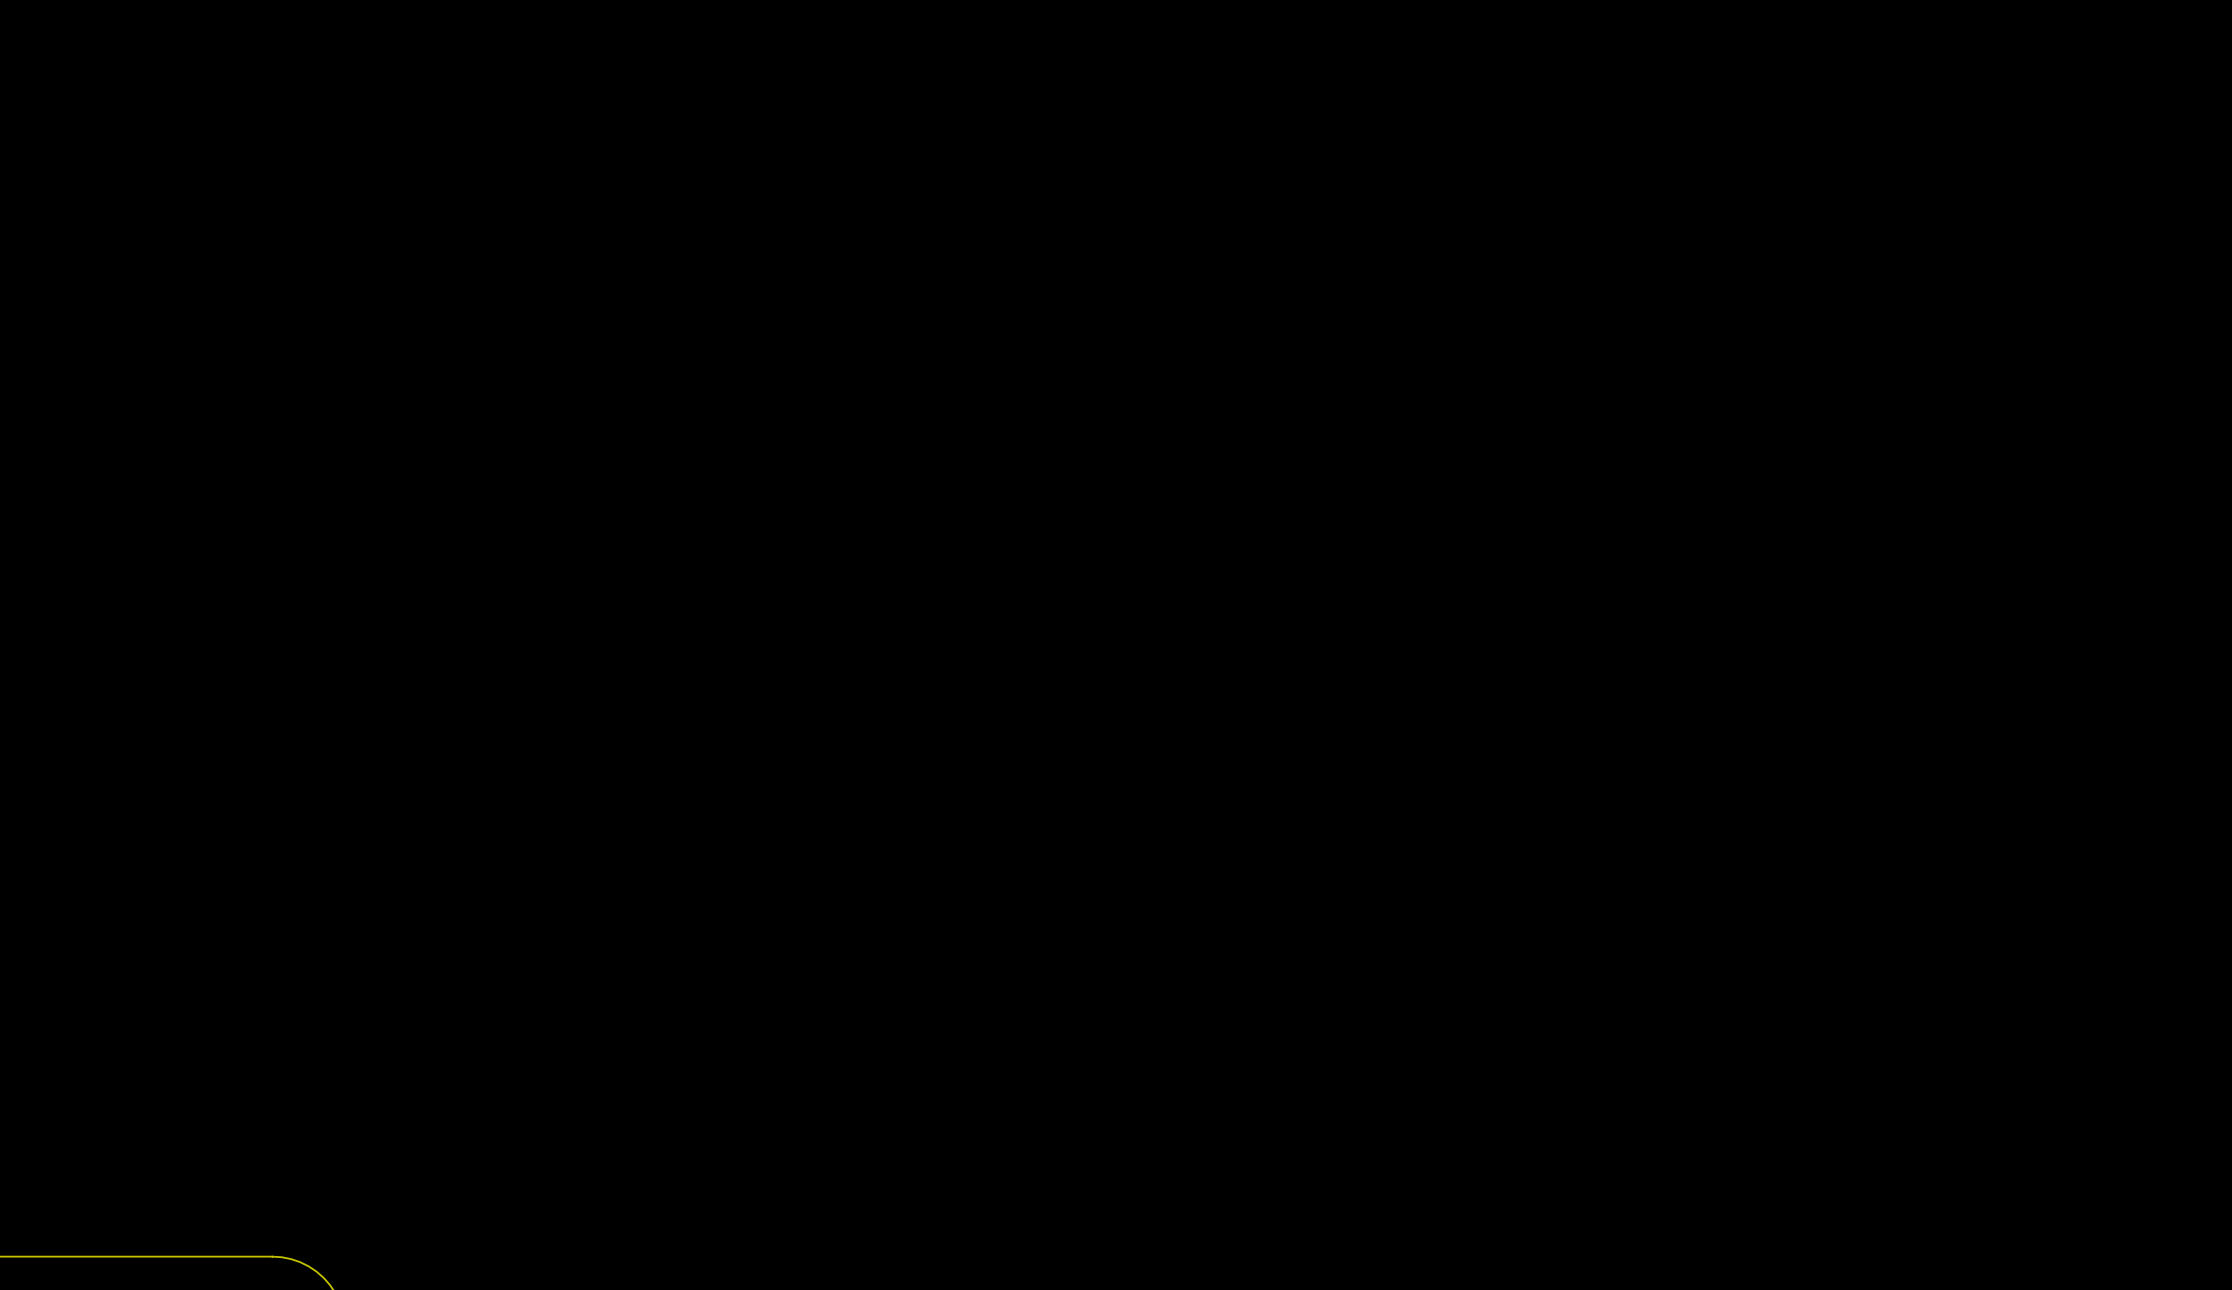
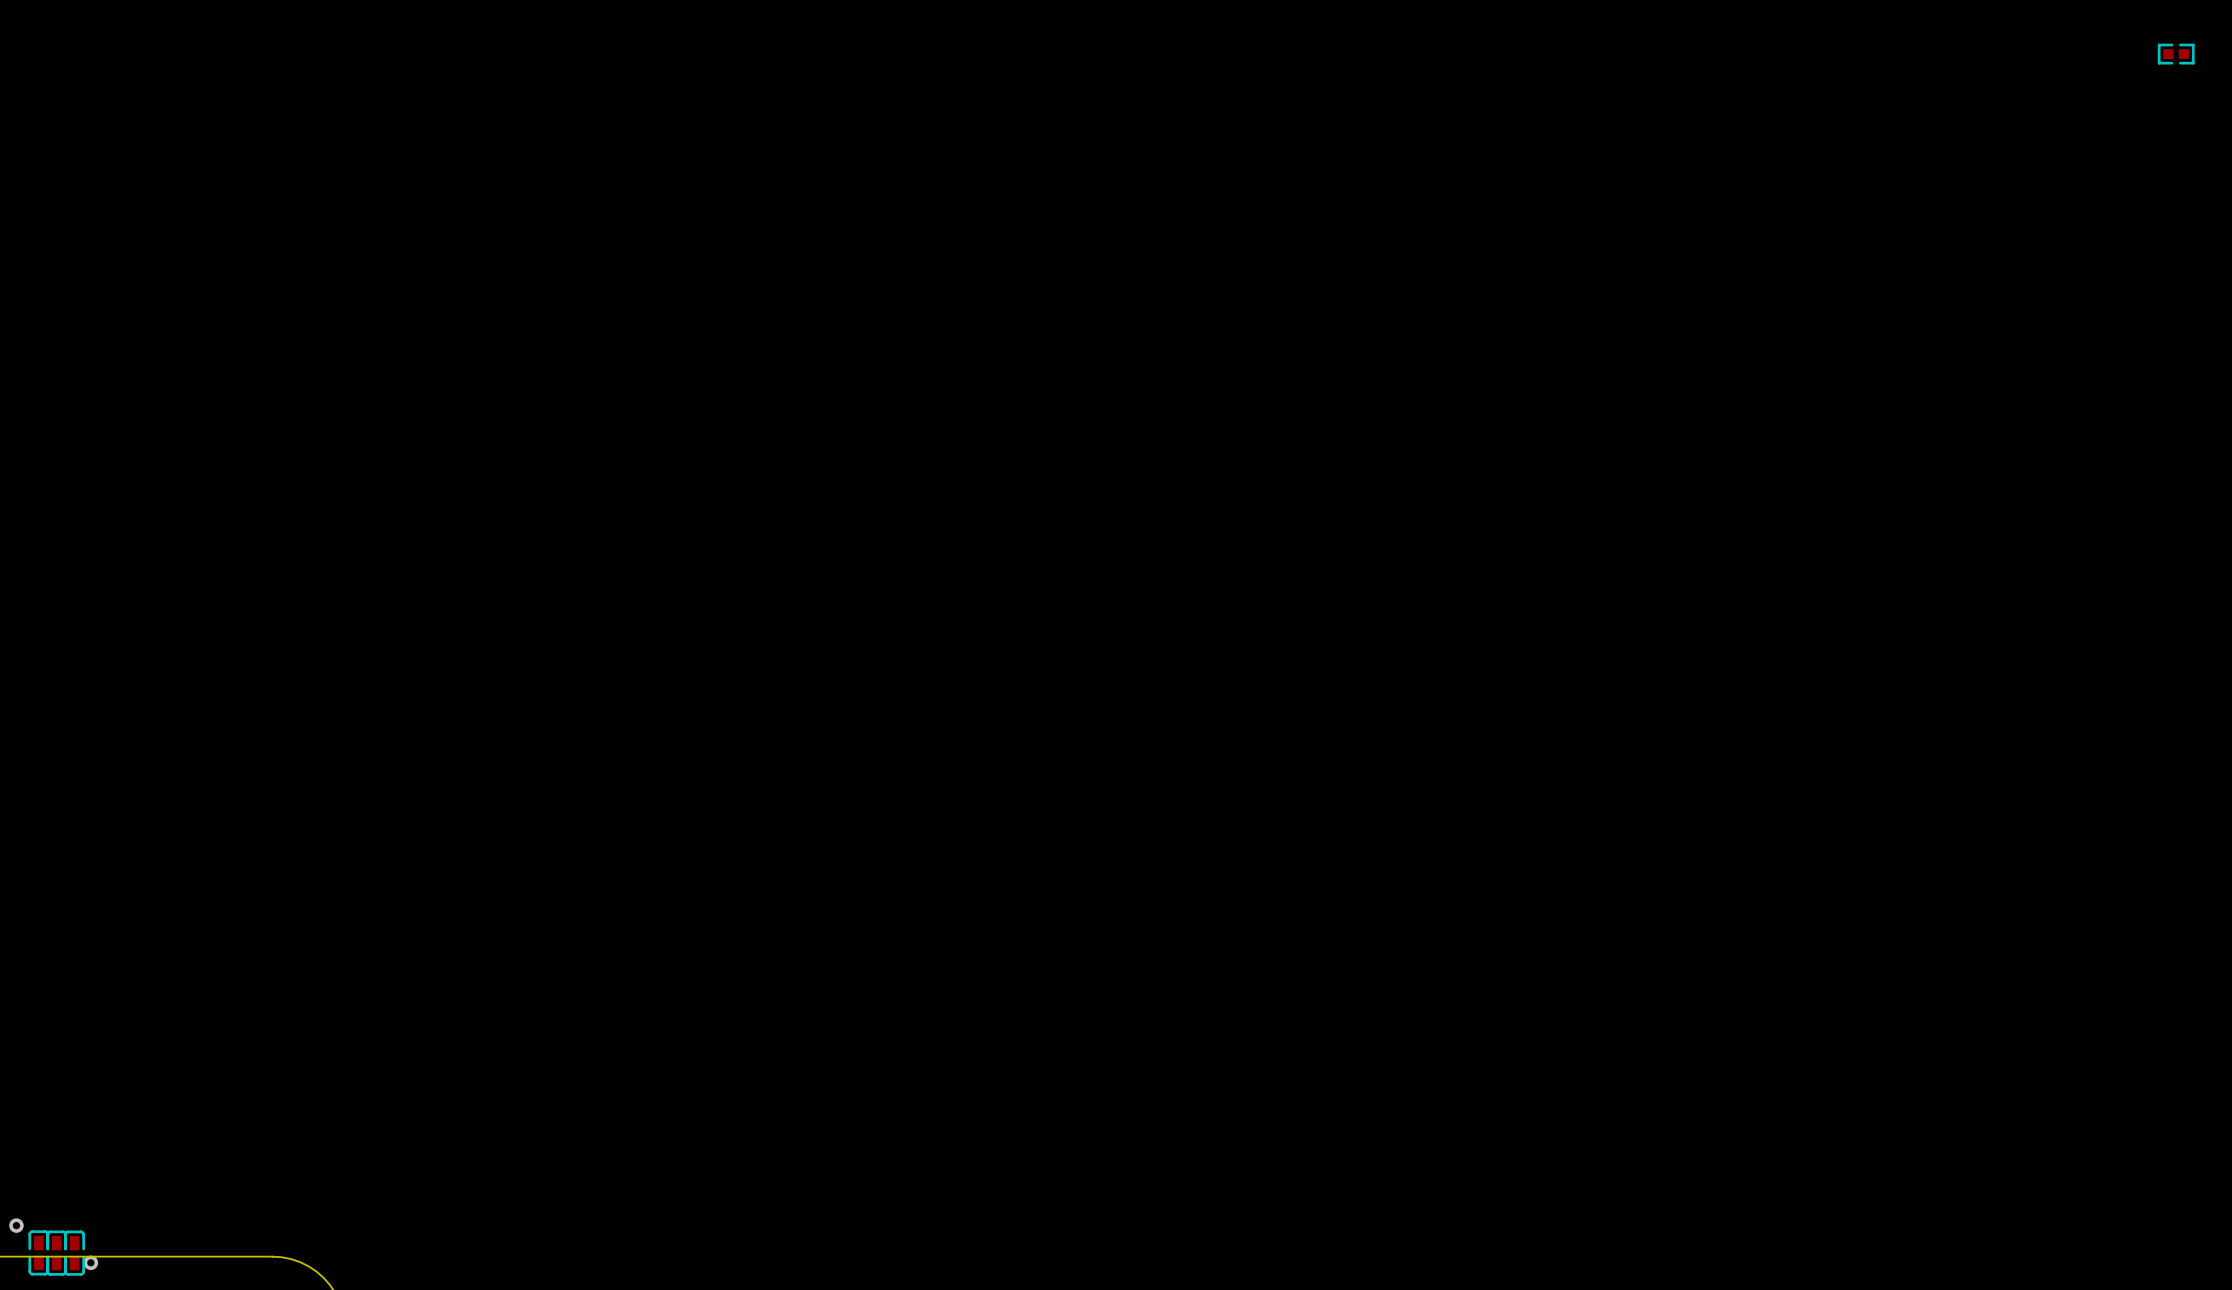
part: none -> (2176, 54)
via: none -> (16, 1225)
part: none -> (38, 1252)
part: none -> (56, 1253)
part: none -> (74, 1253)
via: none -> (90, 1262)

